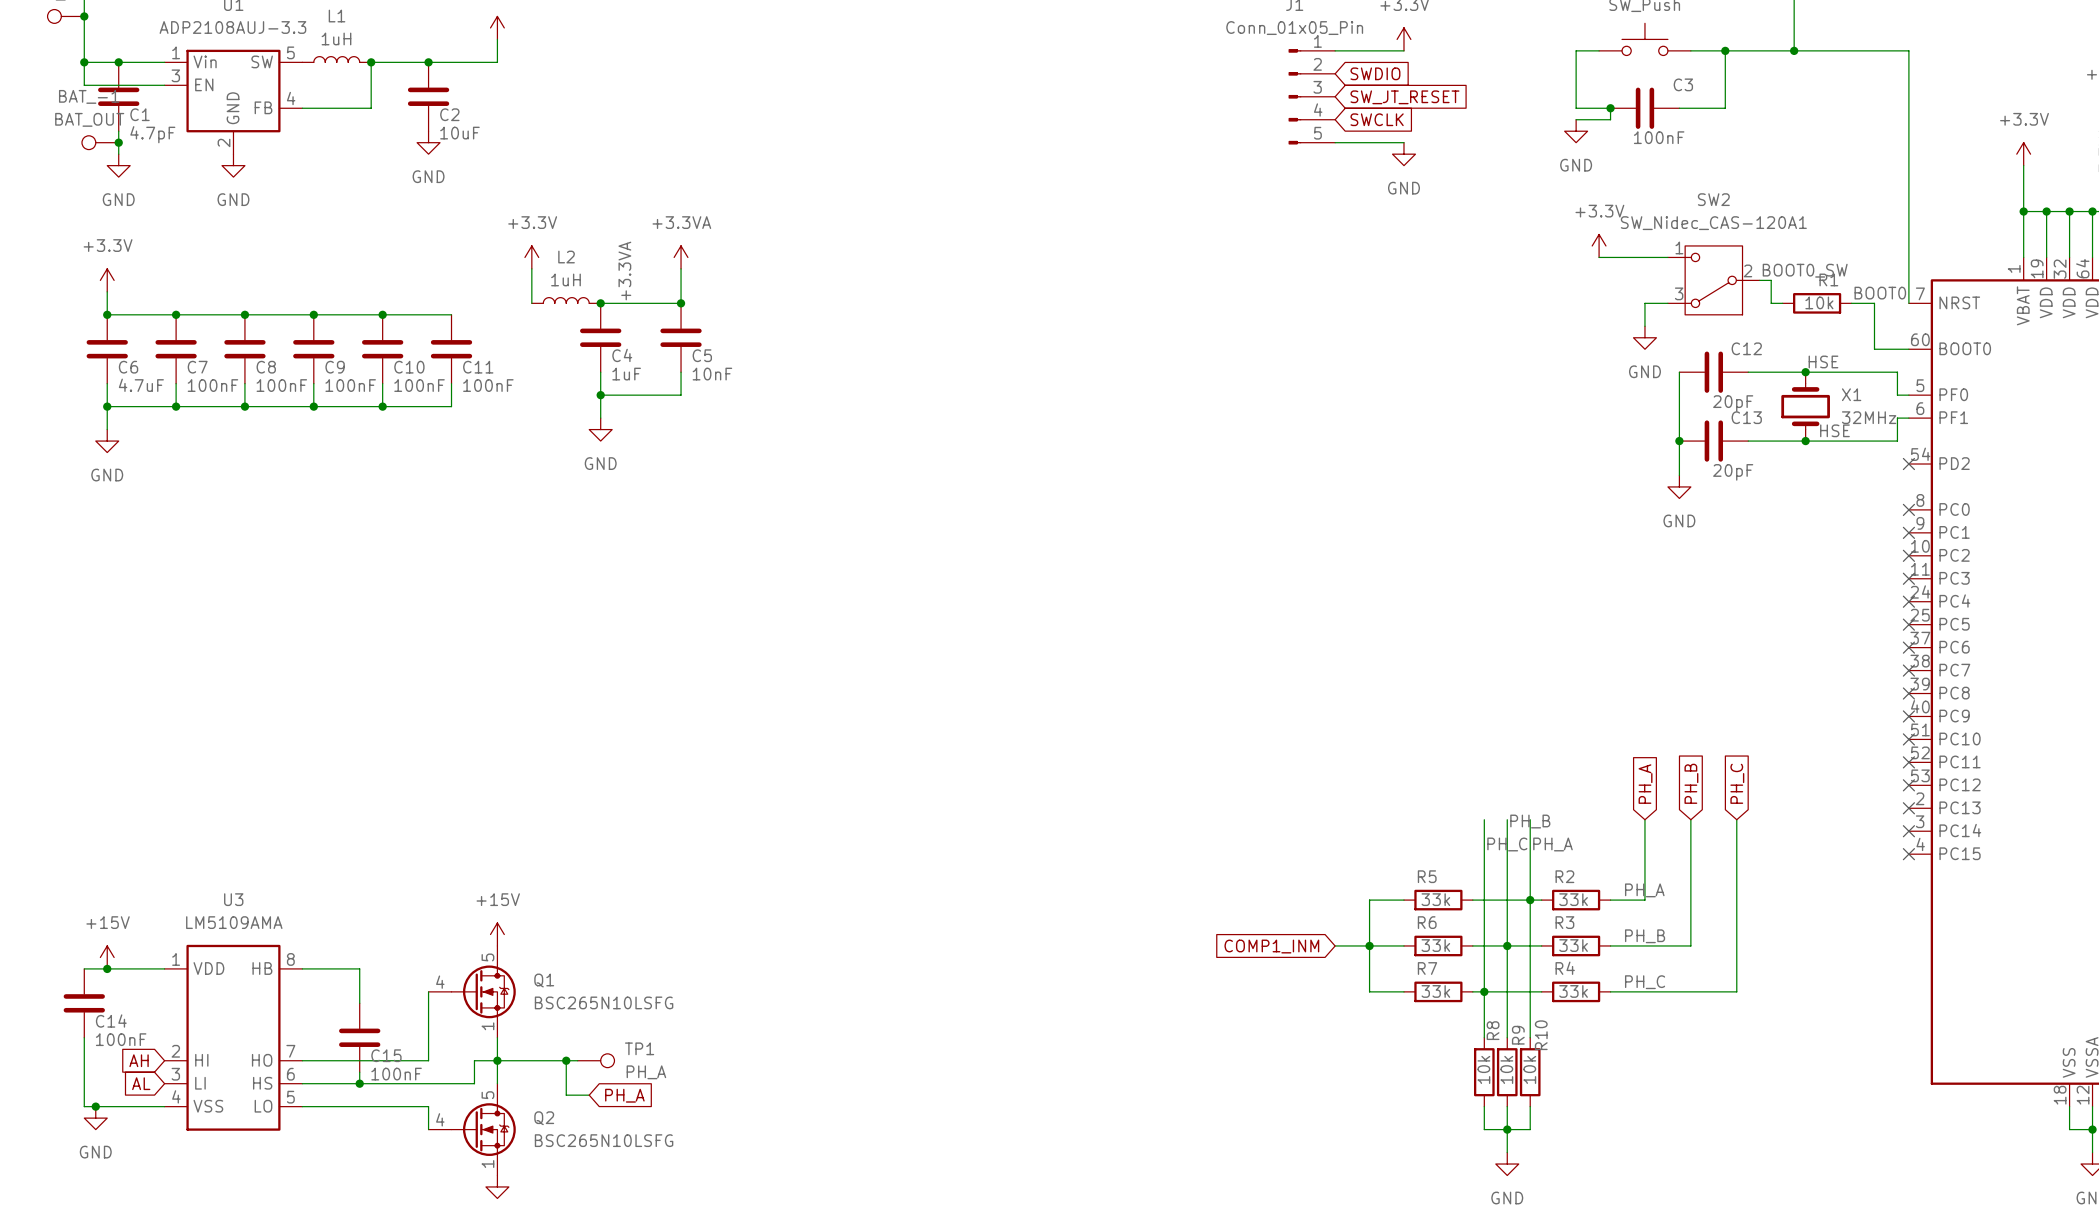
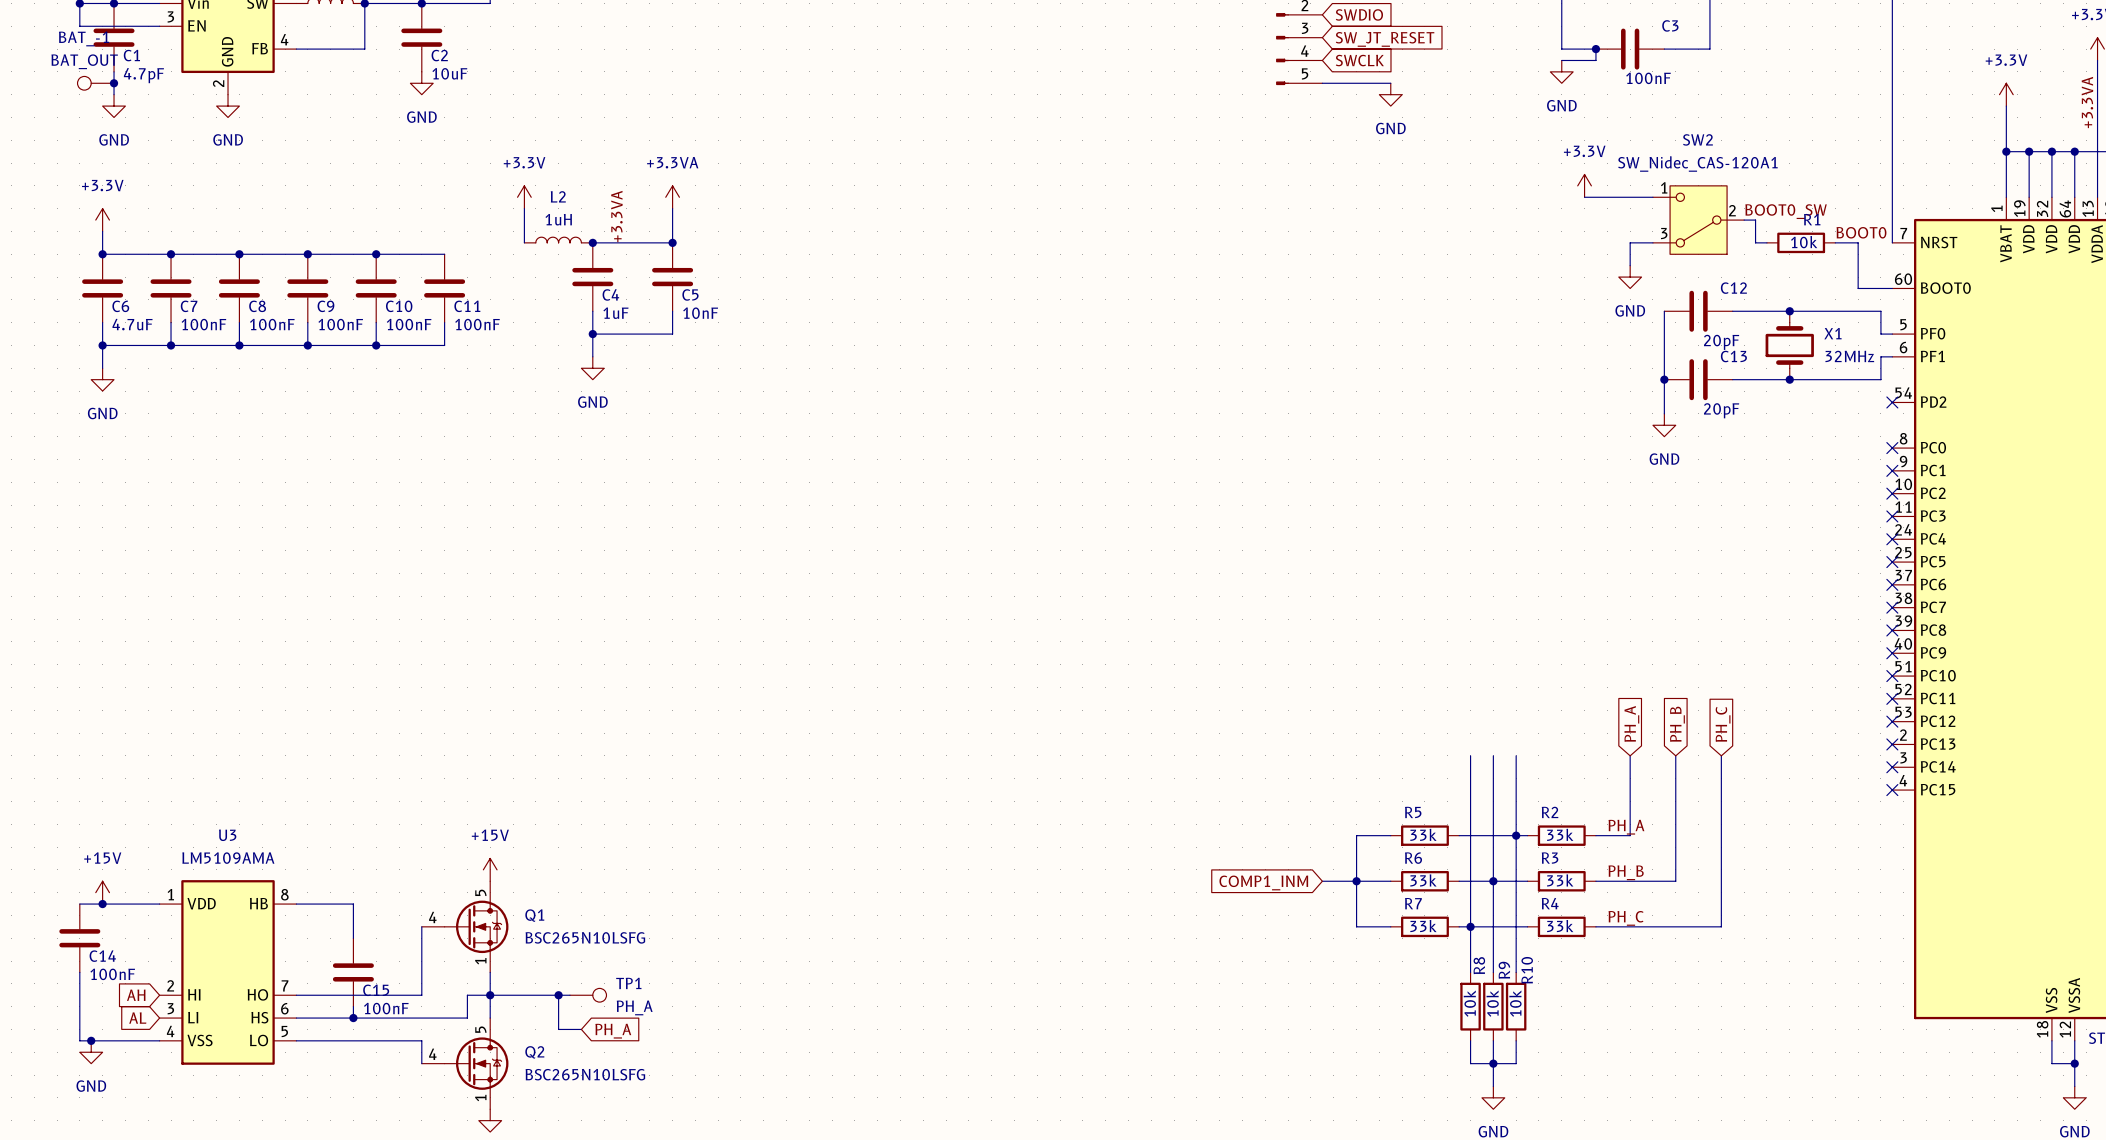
label: HSE (1823, 361) -> none
label: HSE (1834, 430) -> none
label: PH_B (1530, 821) -> none
label: PH_C (1507, 844) -> none
label: PH_A (1552, 844) -> none

